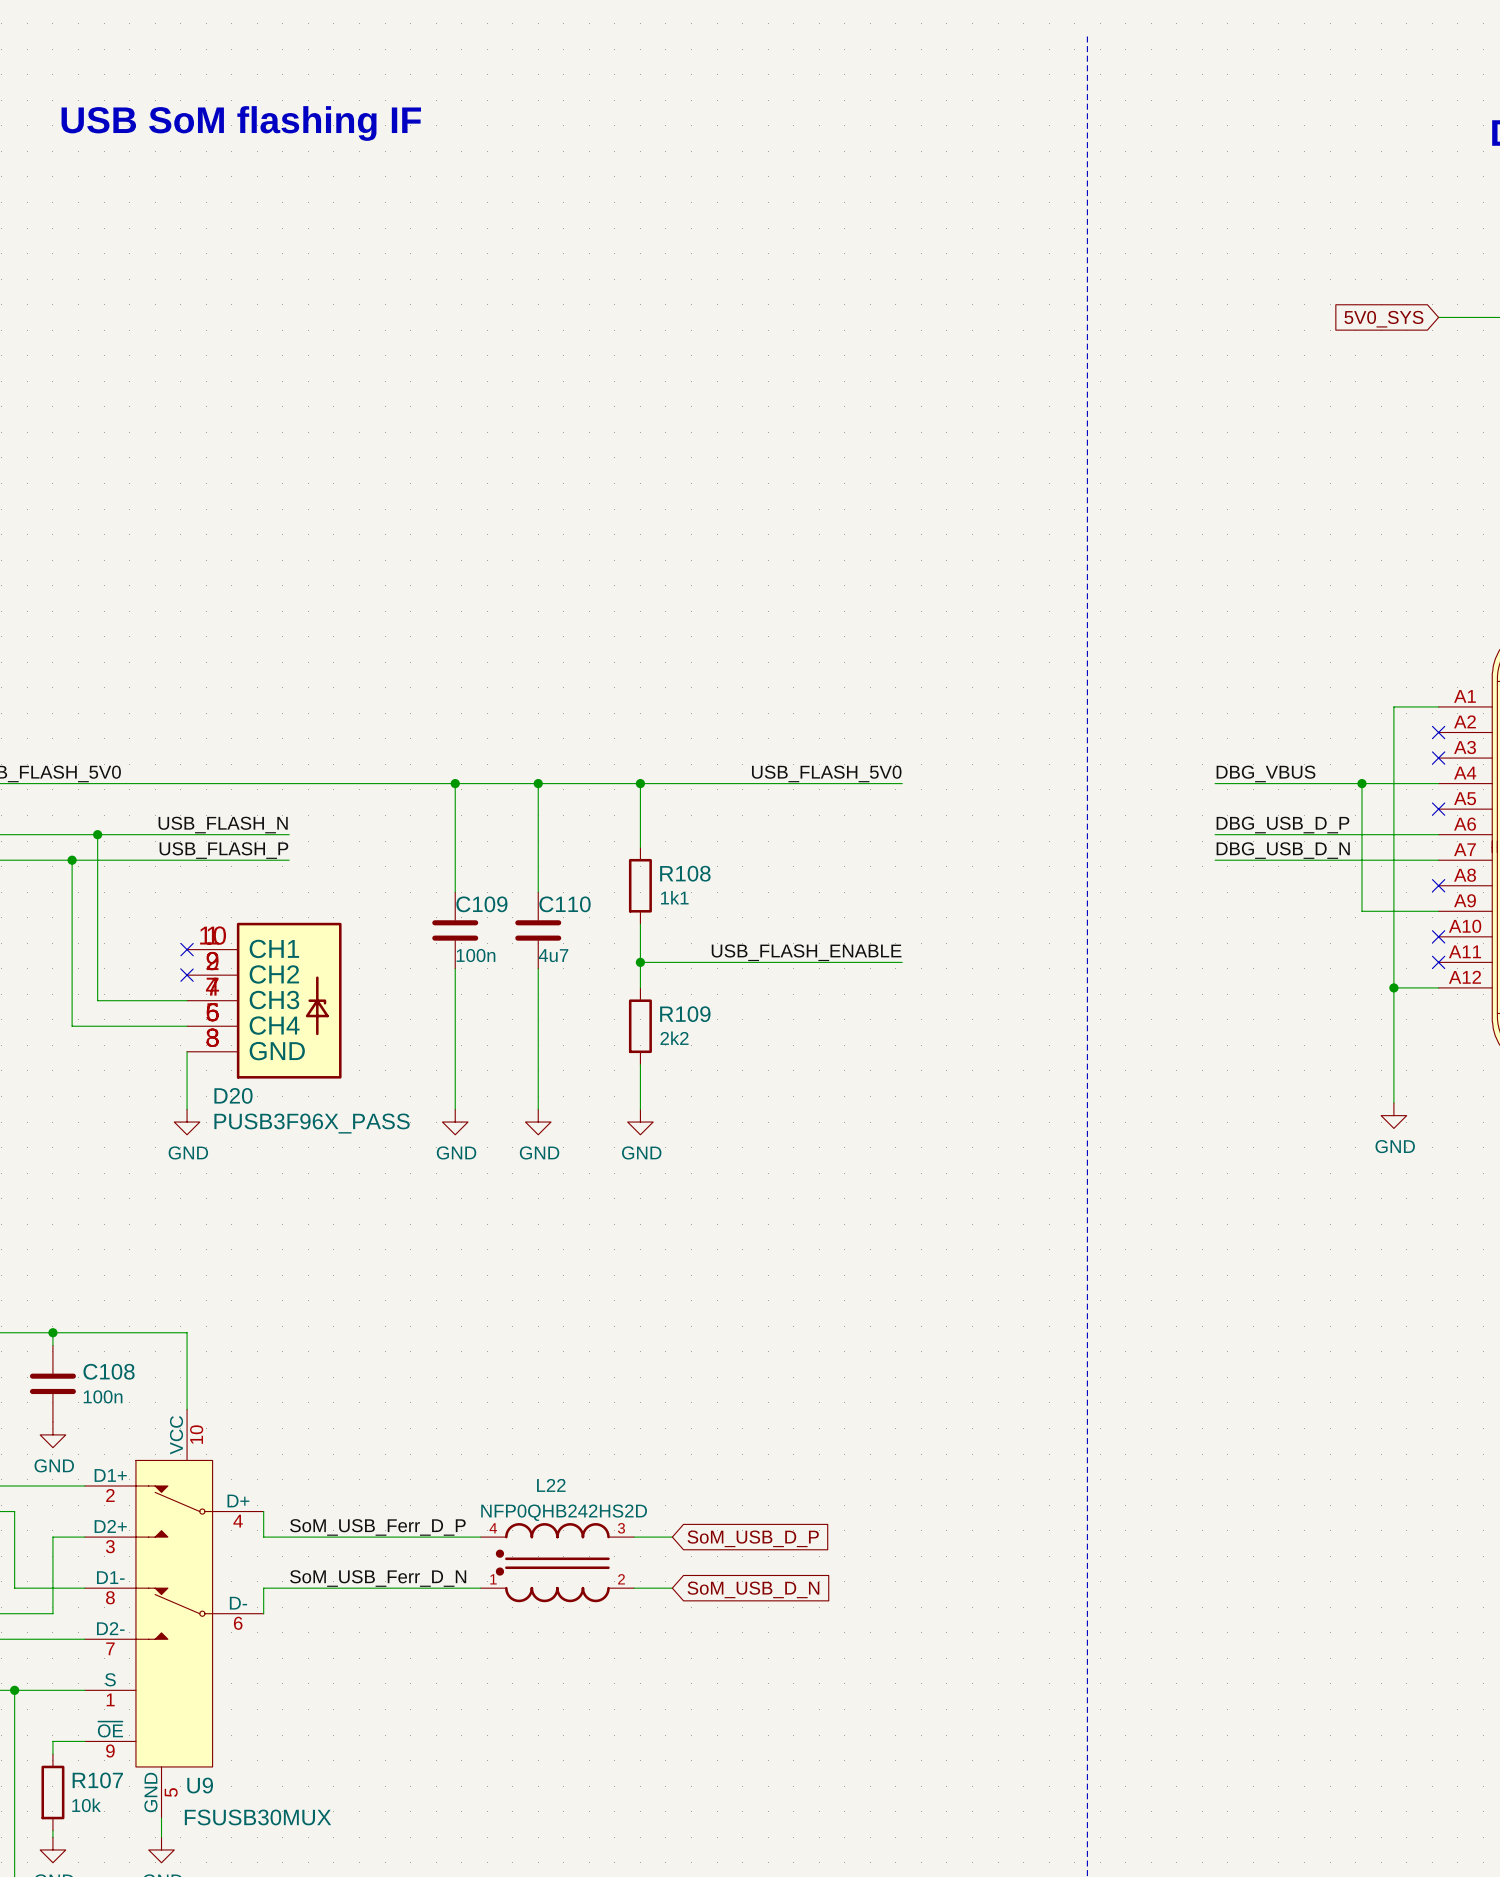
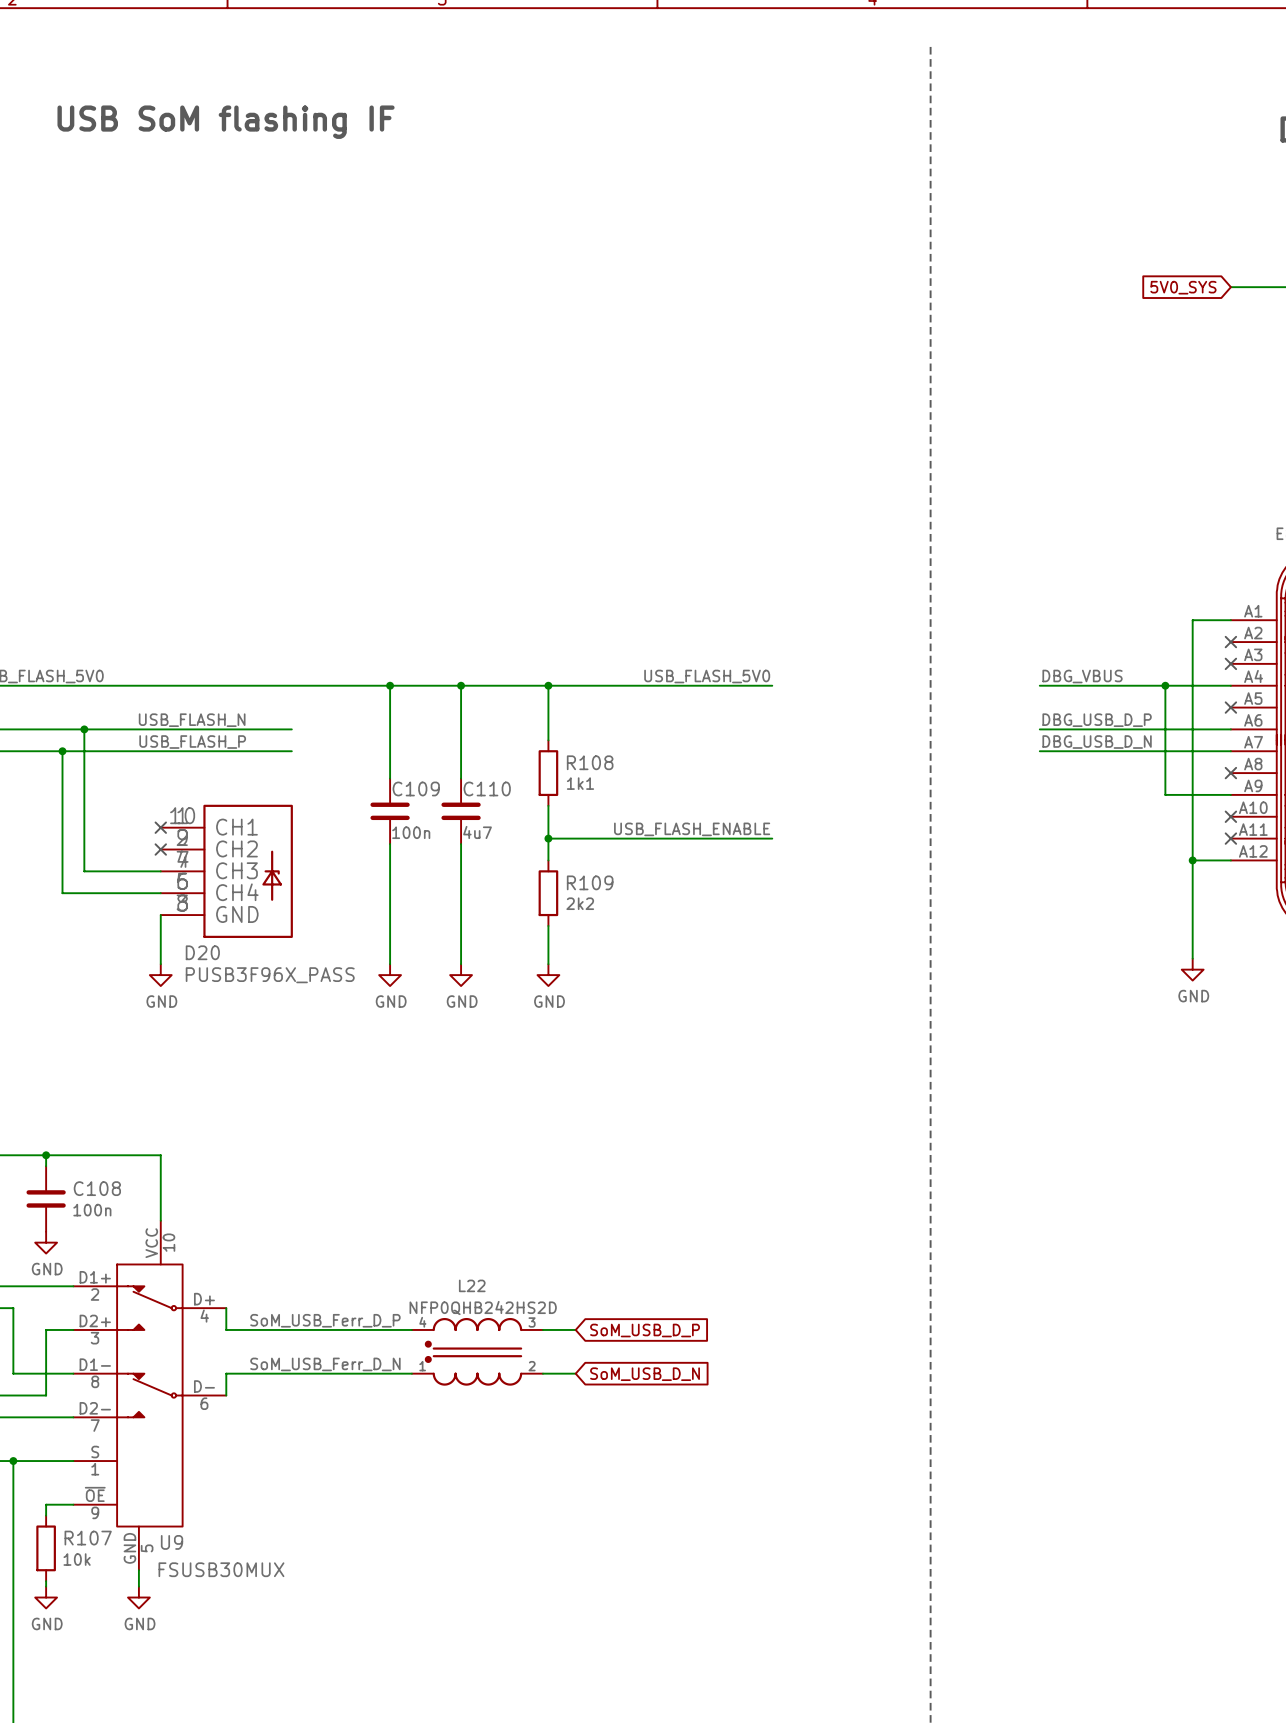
wire: none -> (248, 729) (291, 729)
wire: none -> (248, 751) (291, 751)

